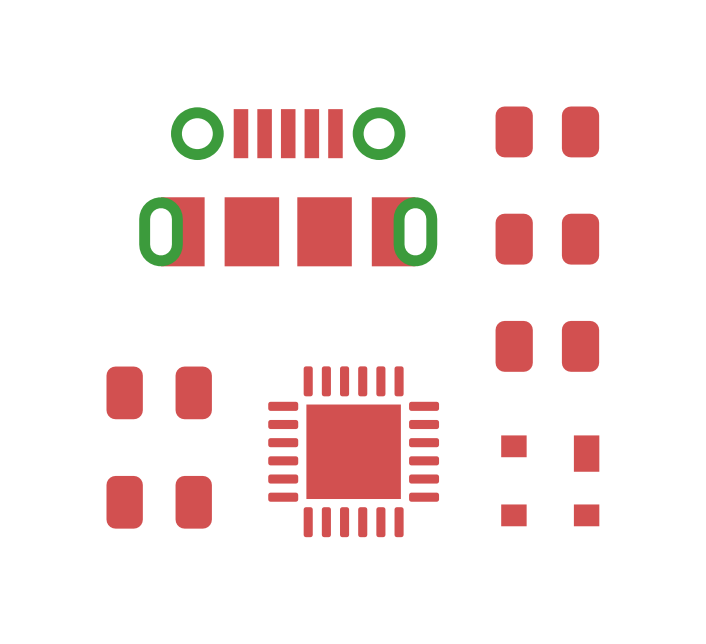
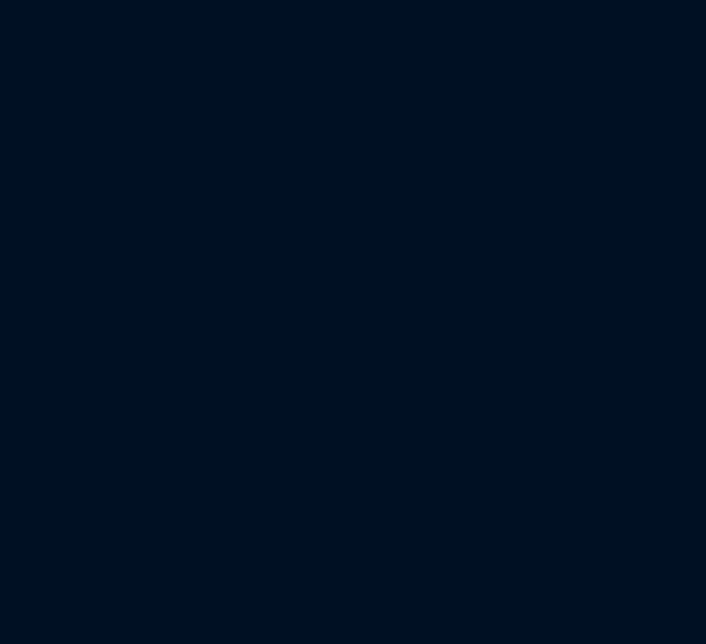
part: (547, 131) -> none
part: (288, 186) -> none
part: (547, 239) -> none
part: (547, 346) -> none
part: (159, 392) -> none
part: (353, 451) -> none
part: (550, 480) -> none
part: (159, 502) -> none

